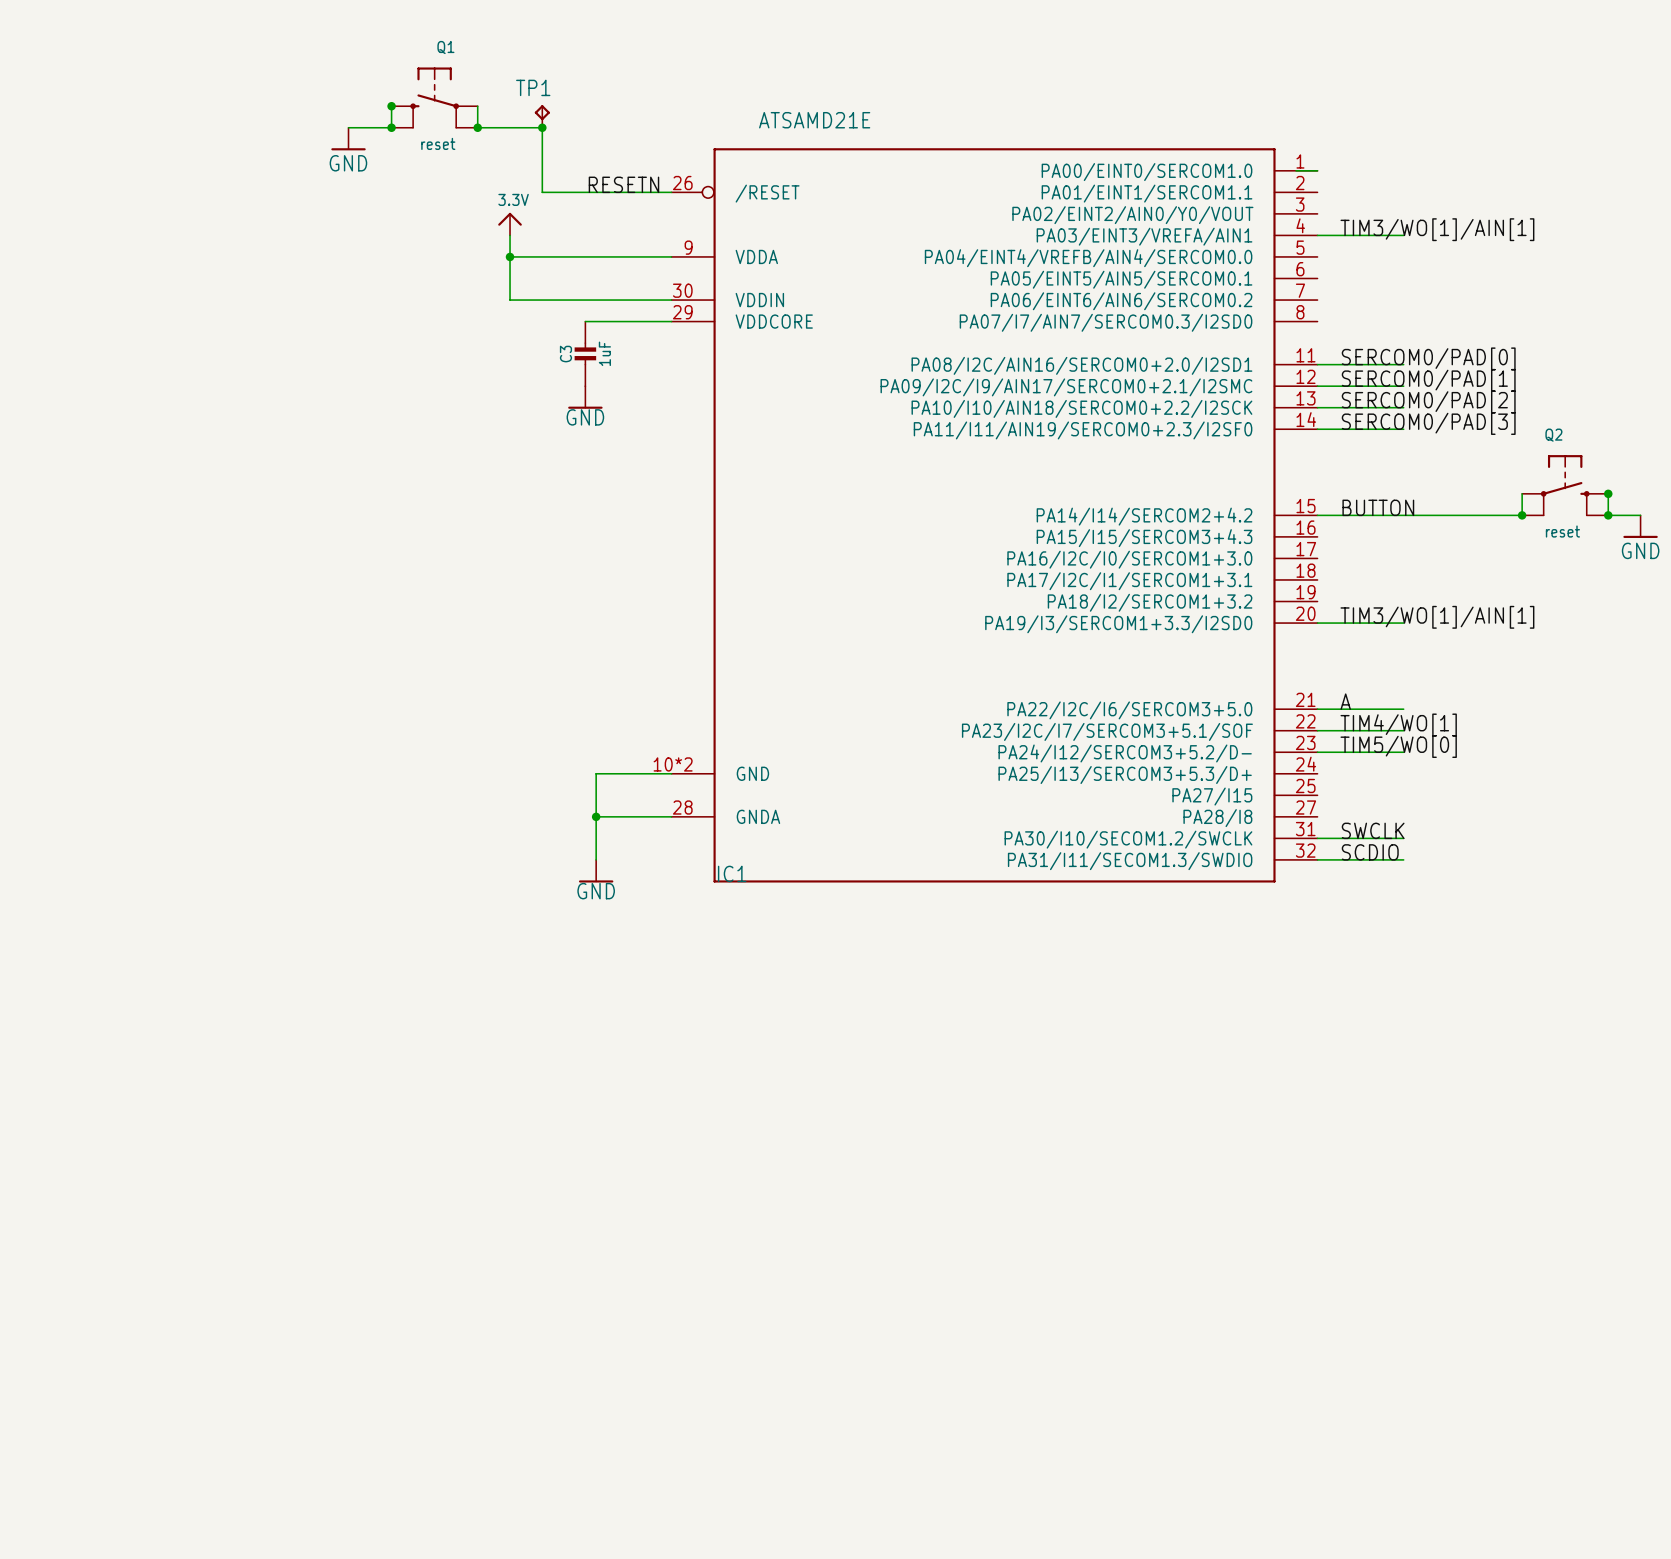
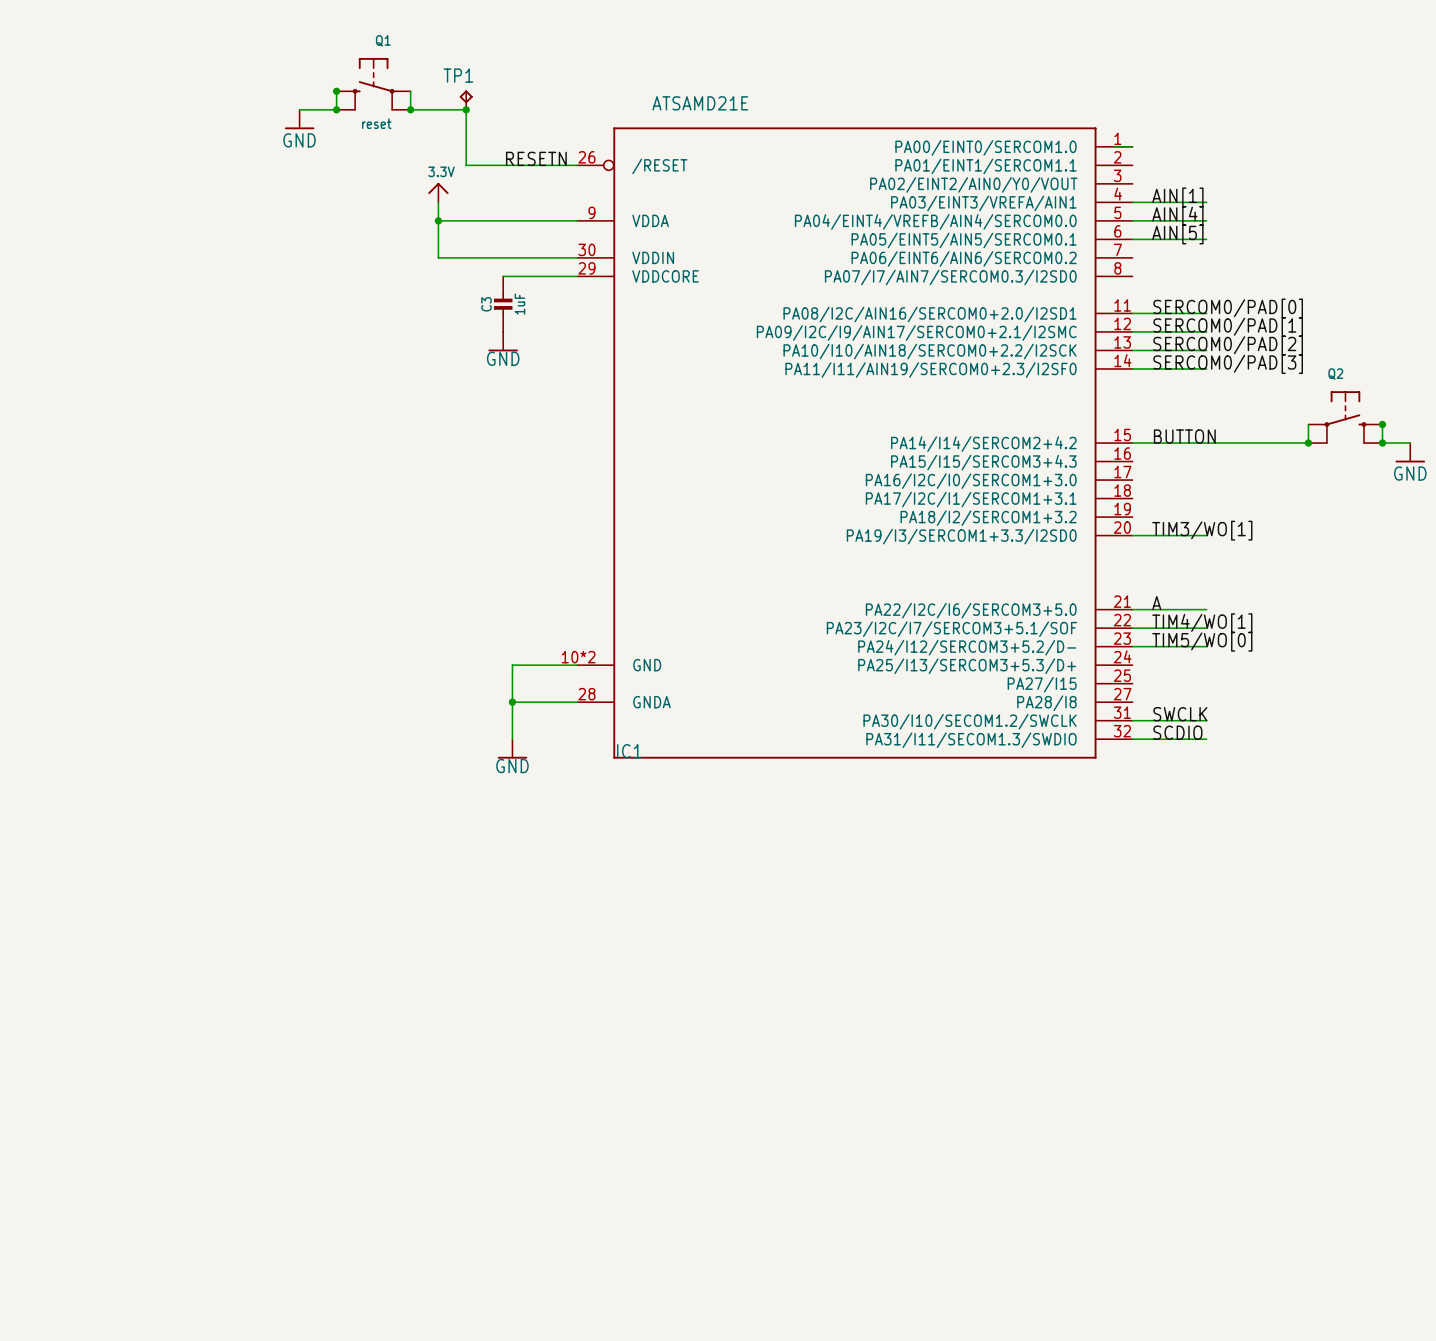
label: TIM3/WO[1]/AIN[1] (1437, 229) -> AIN[1] (1177, 197)
label: none -> AIN[4] (1177, 215)
wire: none -> (1132, 220) (1206, 220)
label: none -> AIN[5] (1177, 234)
wire: none -> (1132, 239) (1206, 239)
Q2 value: reset (1562, 531) -> none
label: TIM3/WO[1]/AIN[1] (1437, 617) -> TIM3/WO[1] (1202, 530)

